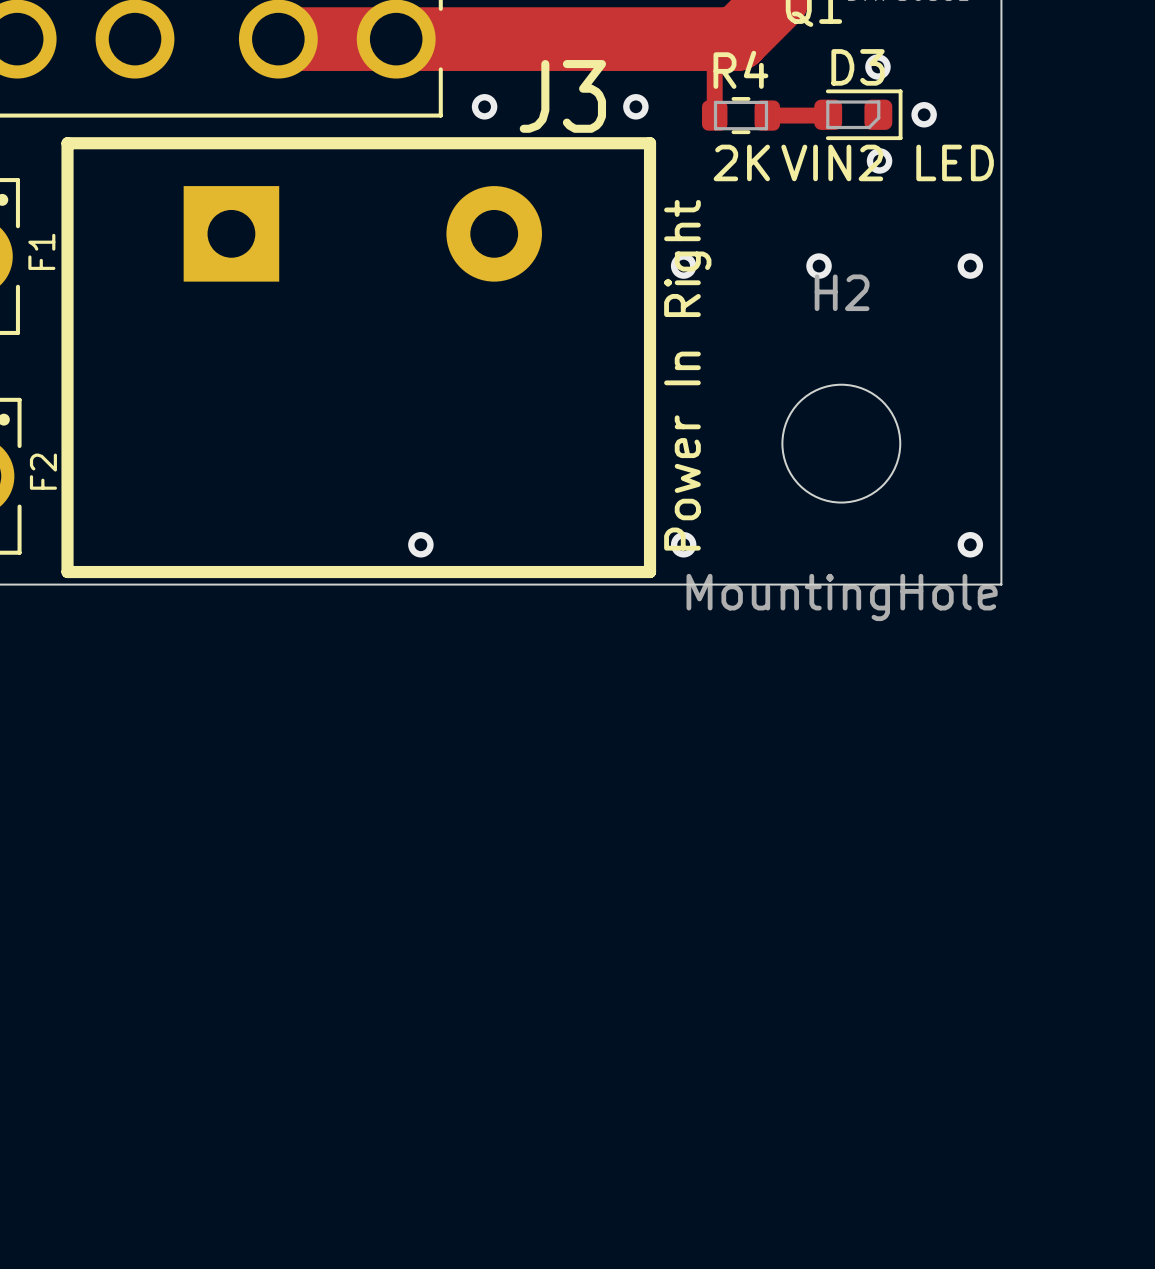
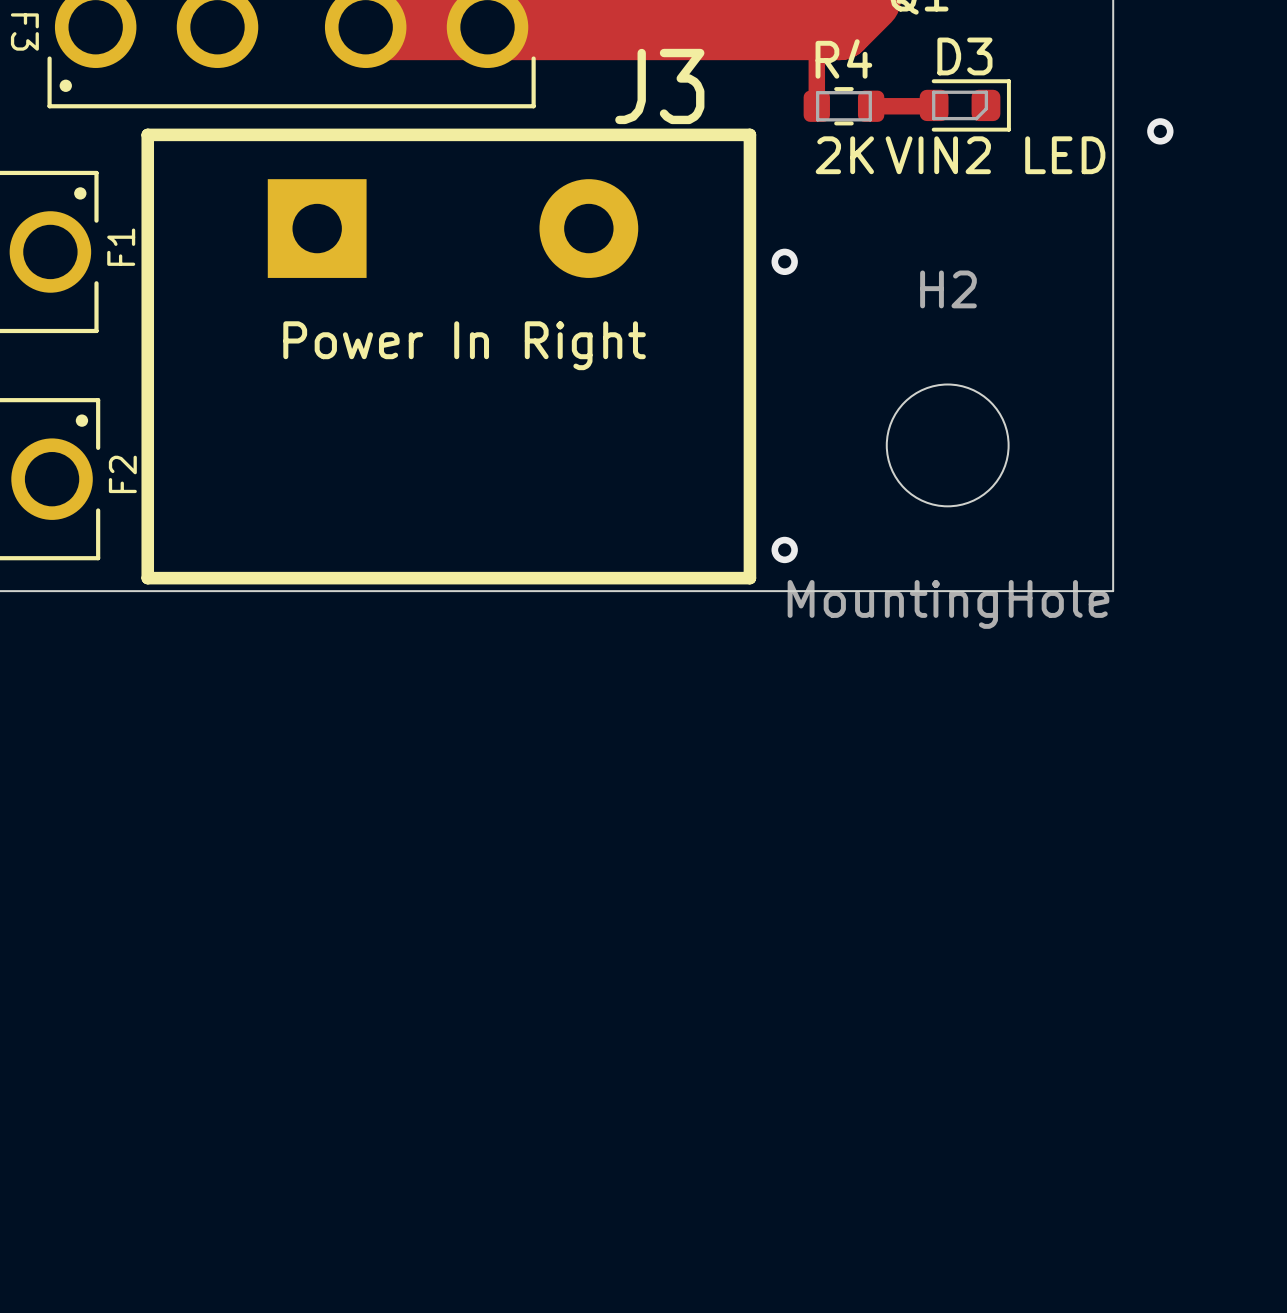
via: (877, 66) -> none
via: (484, 106) -> none
via: (635, 106) -> none
via: (924, 114) -> none
via: none -> (1160, 131)
via: (879, 160) -> none
via: (819, 266) -> none
via: (970, 266) -> none
J3 value rotation: 0° (687, 375) -> 90° clockwise (464, 345)
via: (420, 544) -> none
via: (970, 544) -> none

